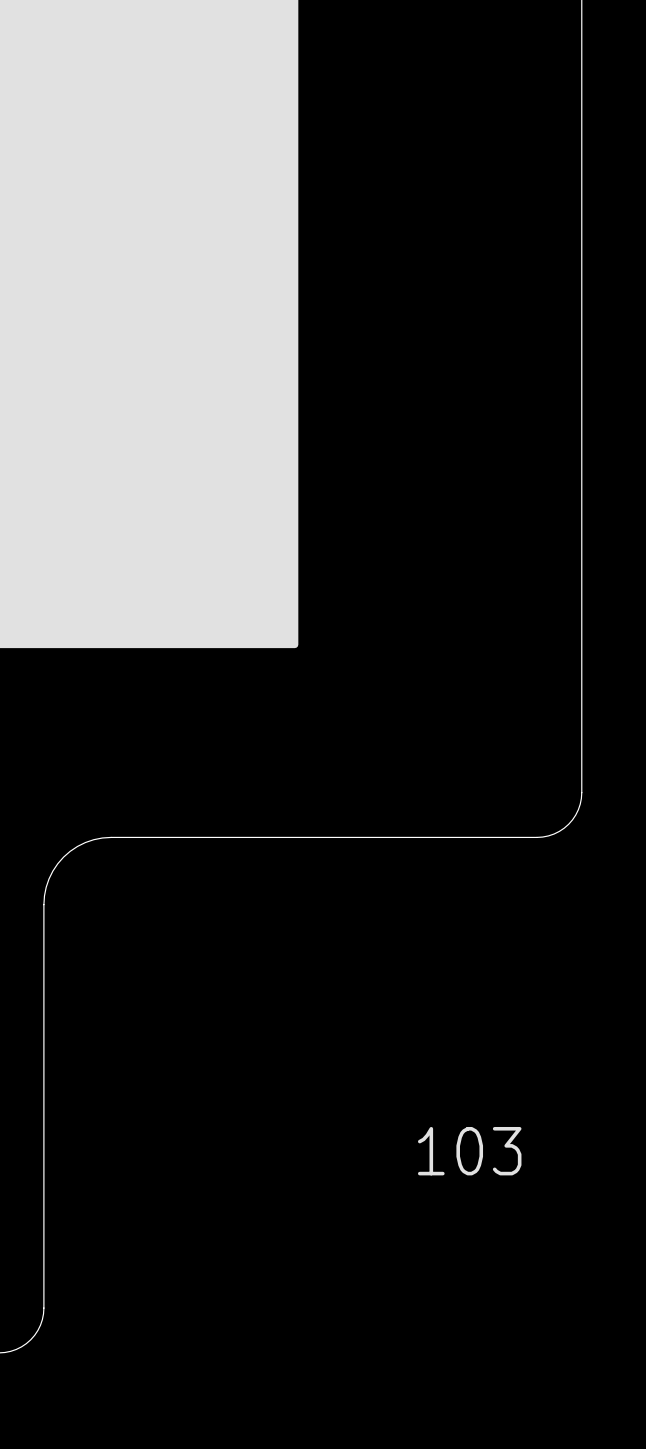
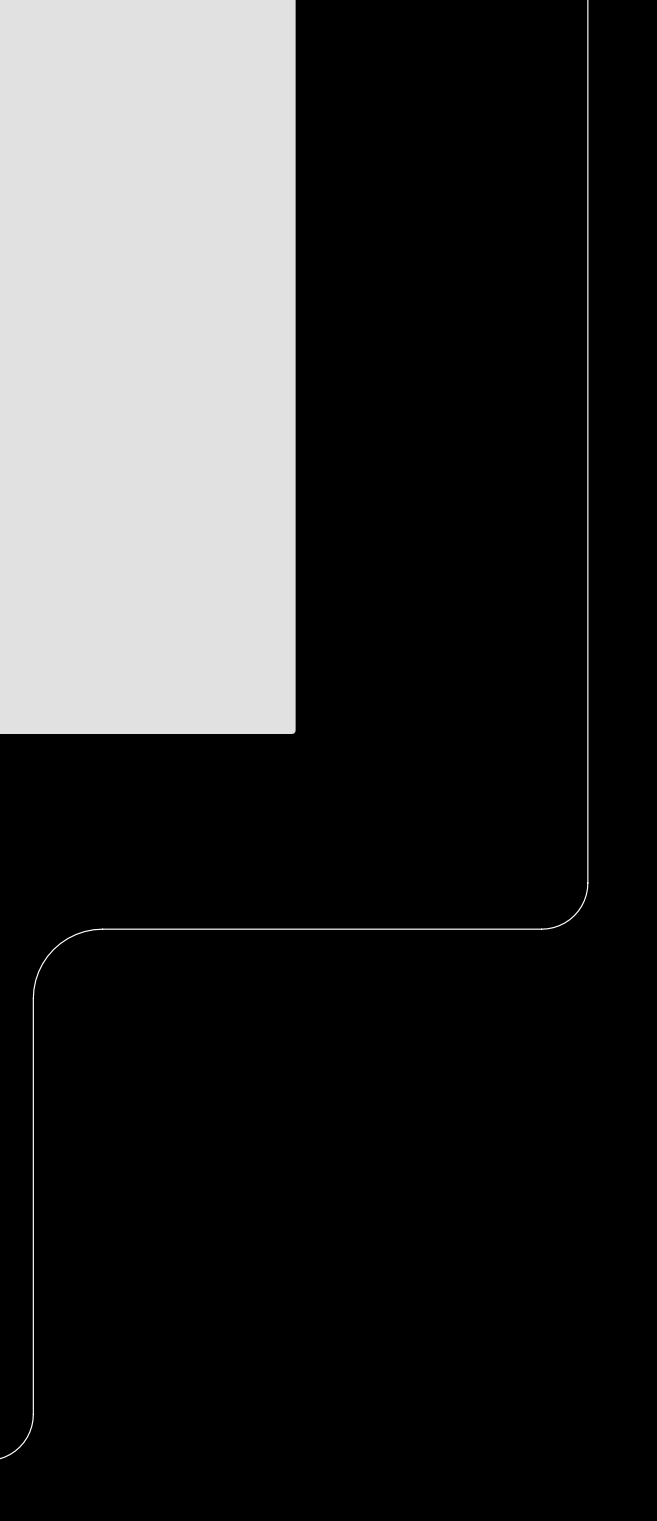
text: 103 (469, 1151) -> none

